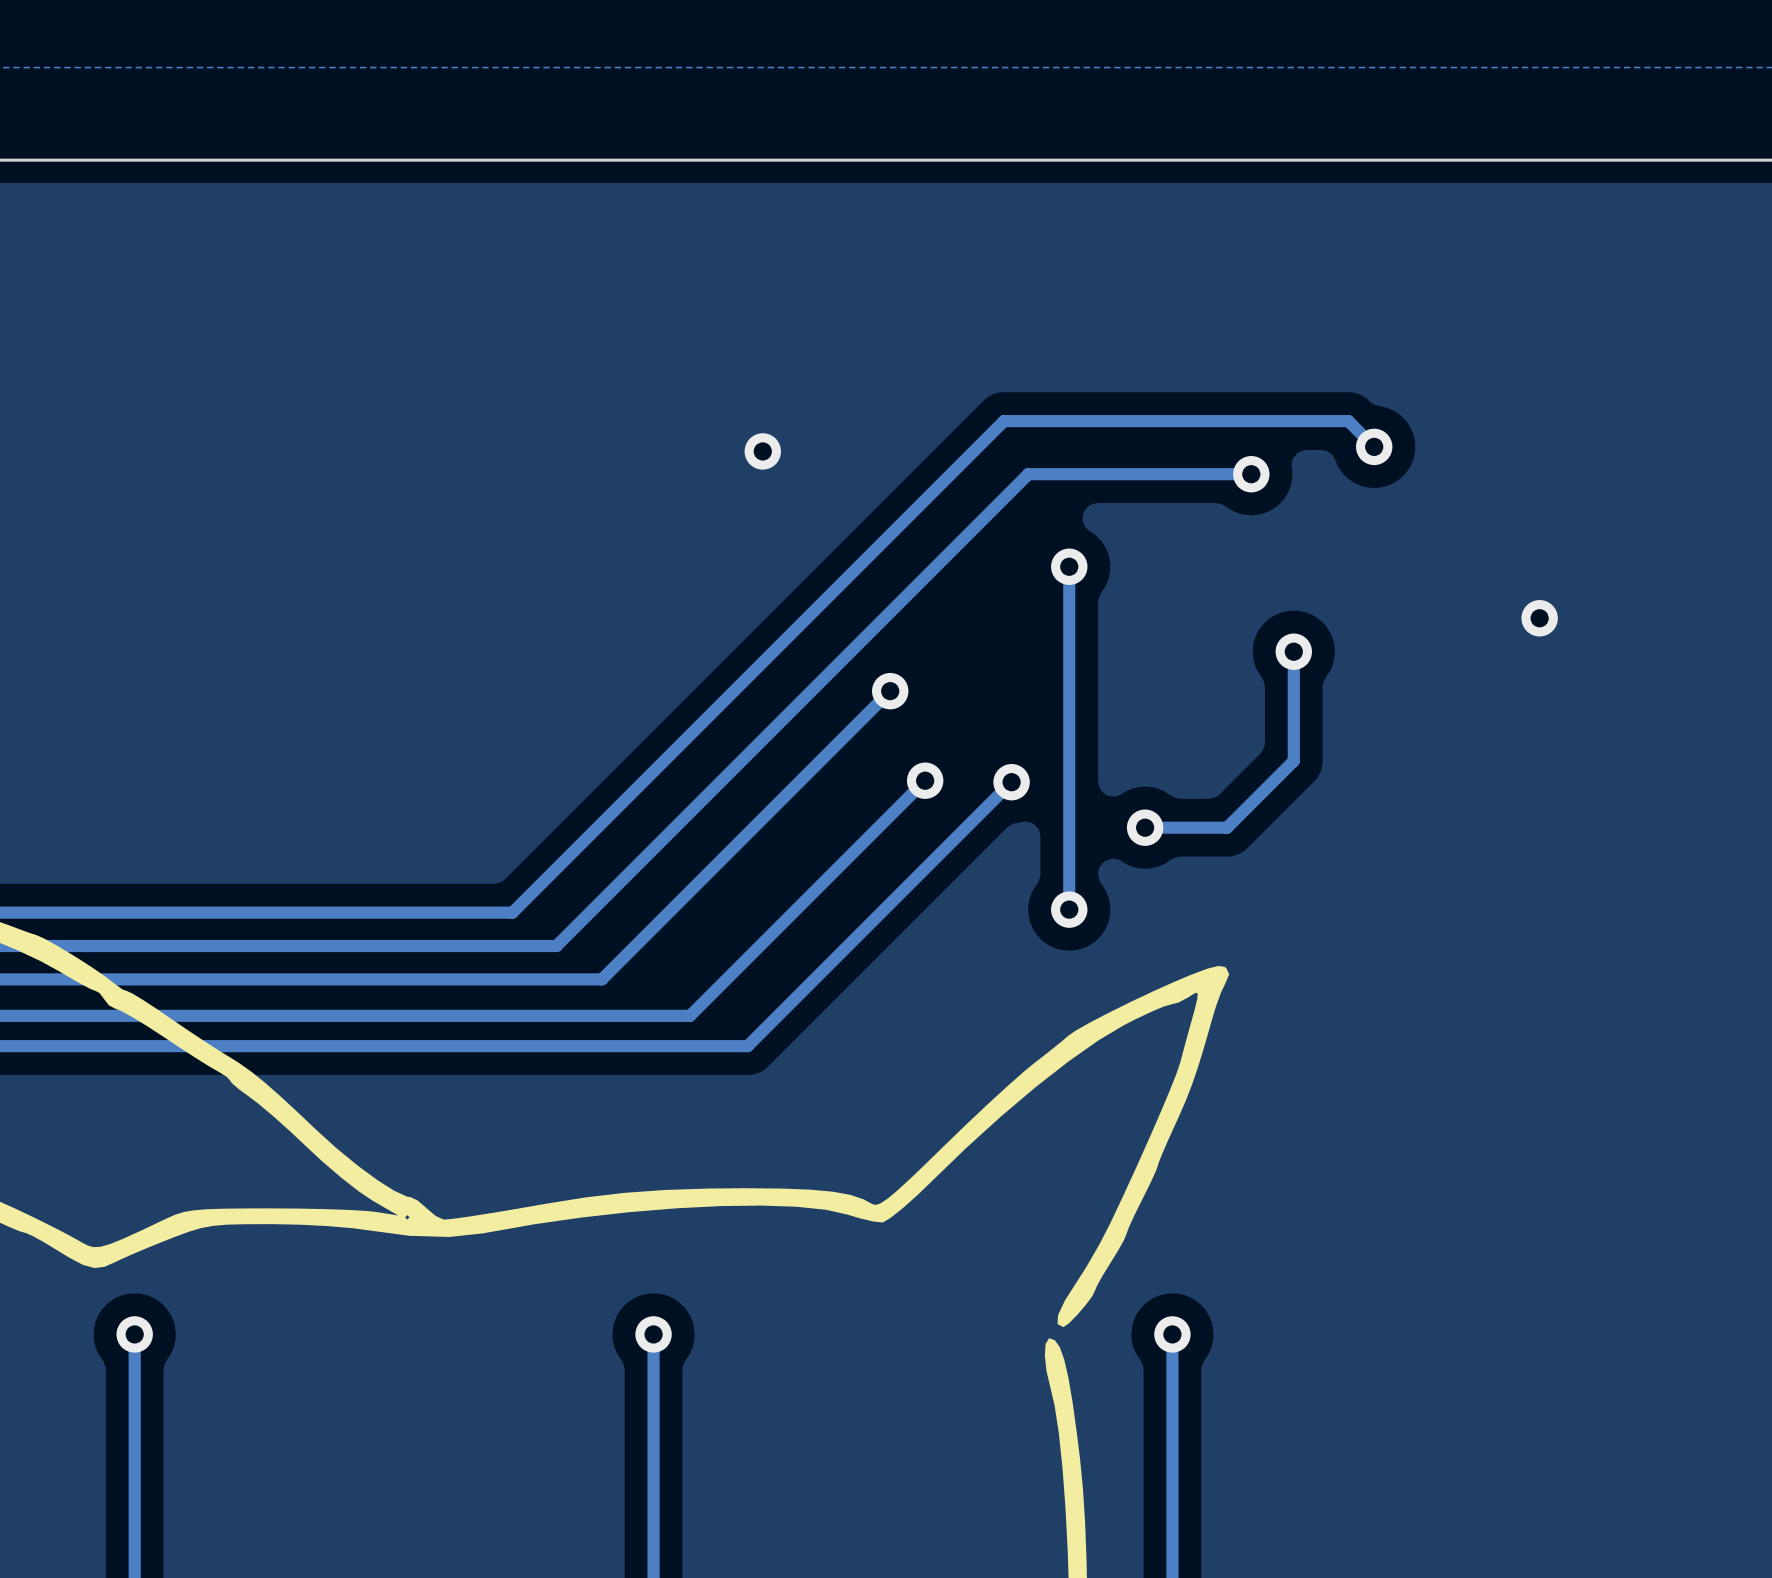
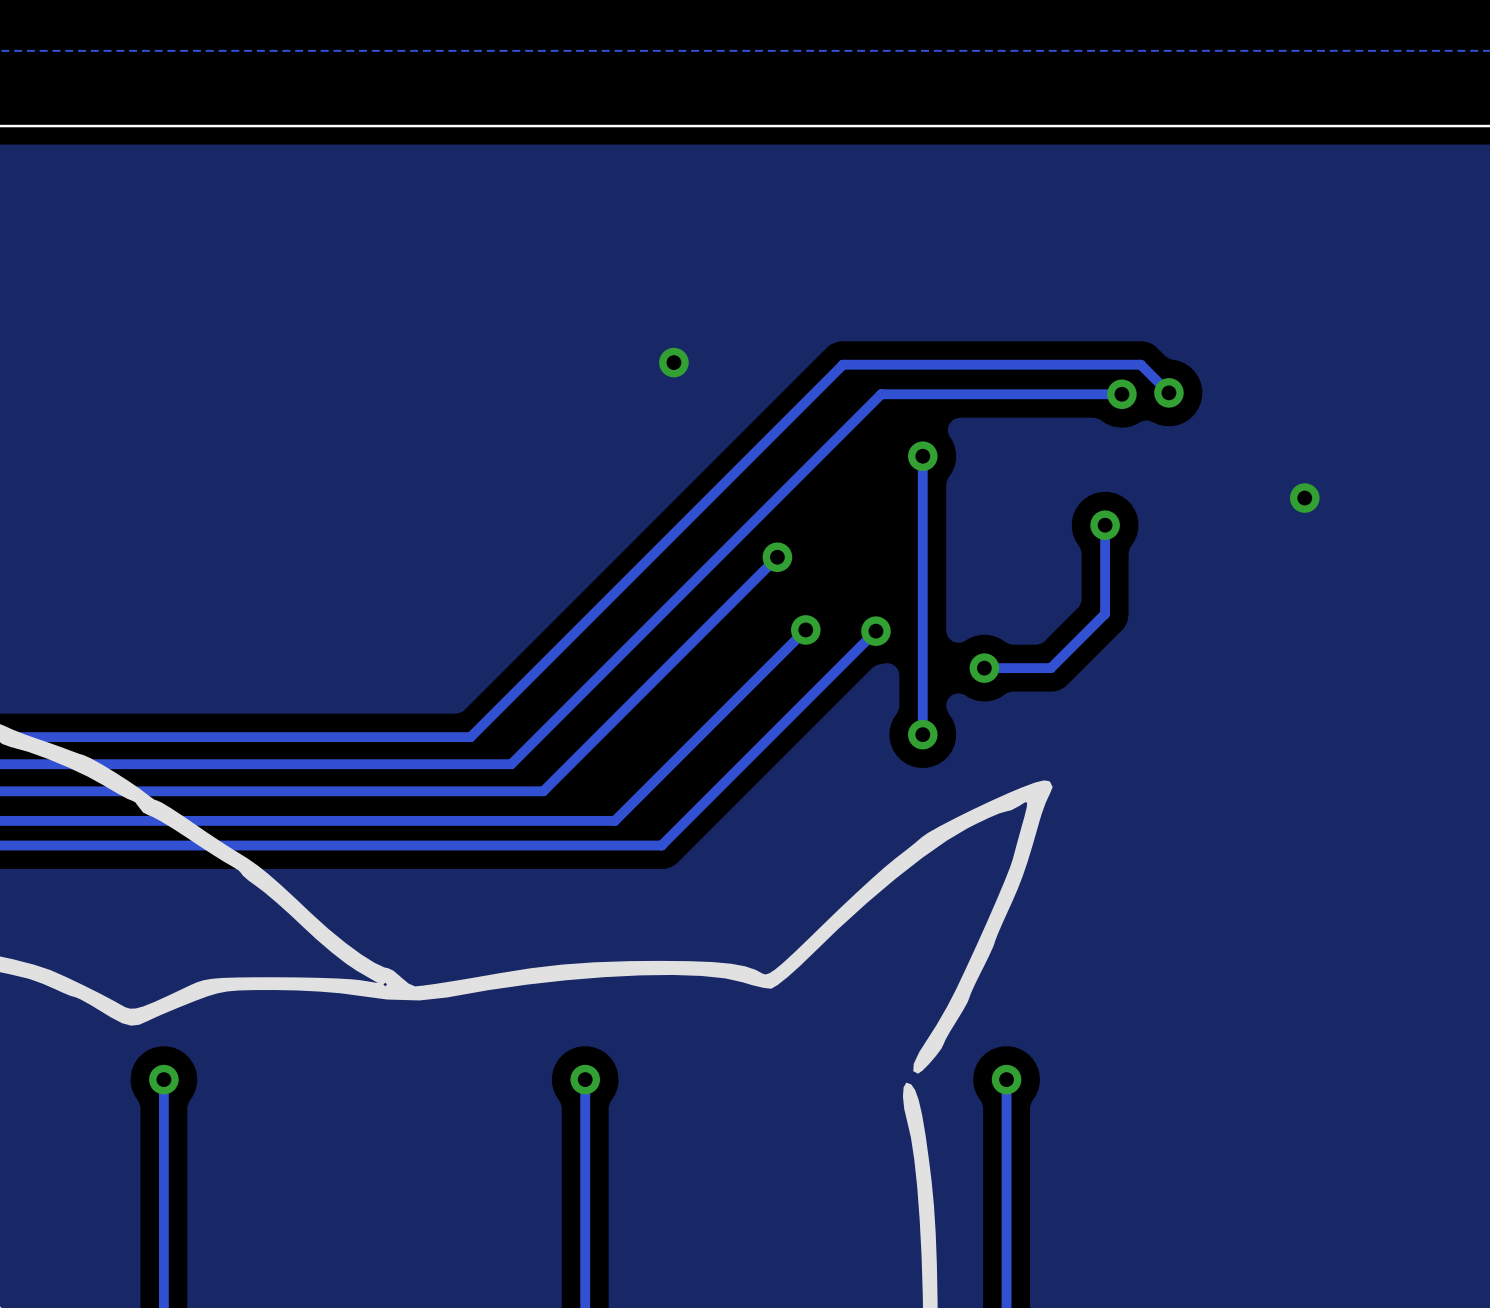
track: (1374, 446) (1348, 421) (1004, 421) (971, 454) -> (1168, 392) (1140, 364) (843, 364)
via: (1374, 446) -> none
track: (1251, 474) (1028, 474) (556, 946) -> (1121, 394) (881, 394) (511, 764) (506, 764)
via: (1251, 474) -> none
via: none -> (1168, 392)
via: none -> (1121, 394)

